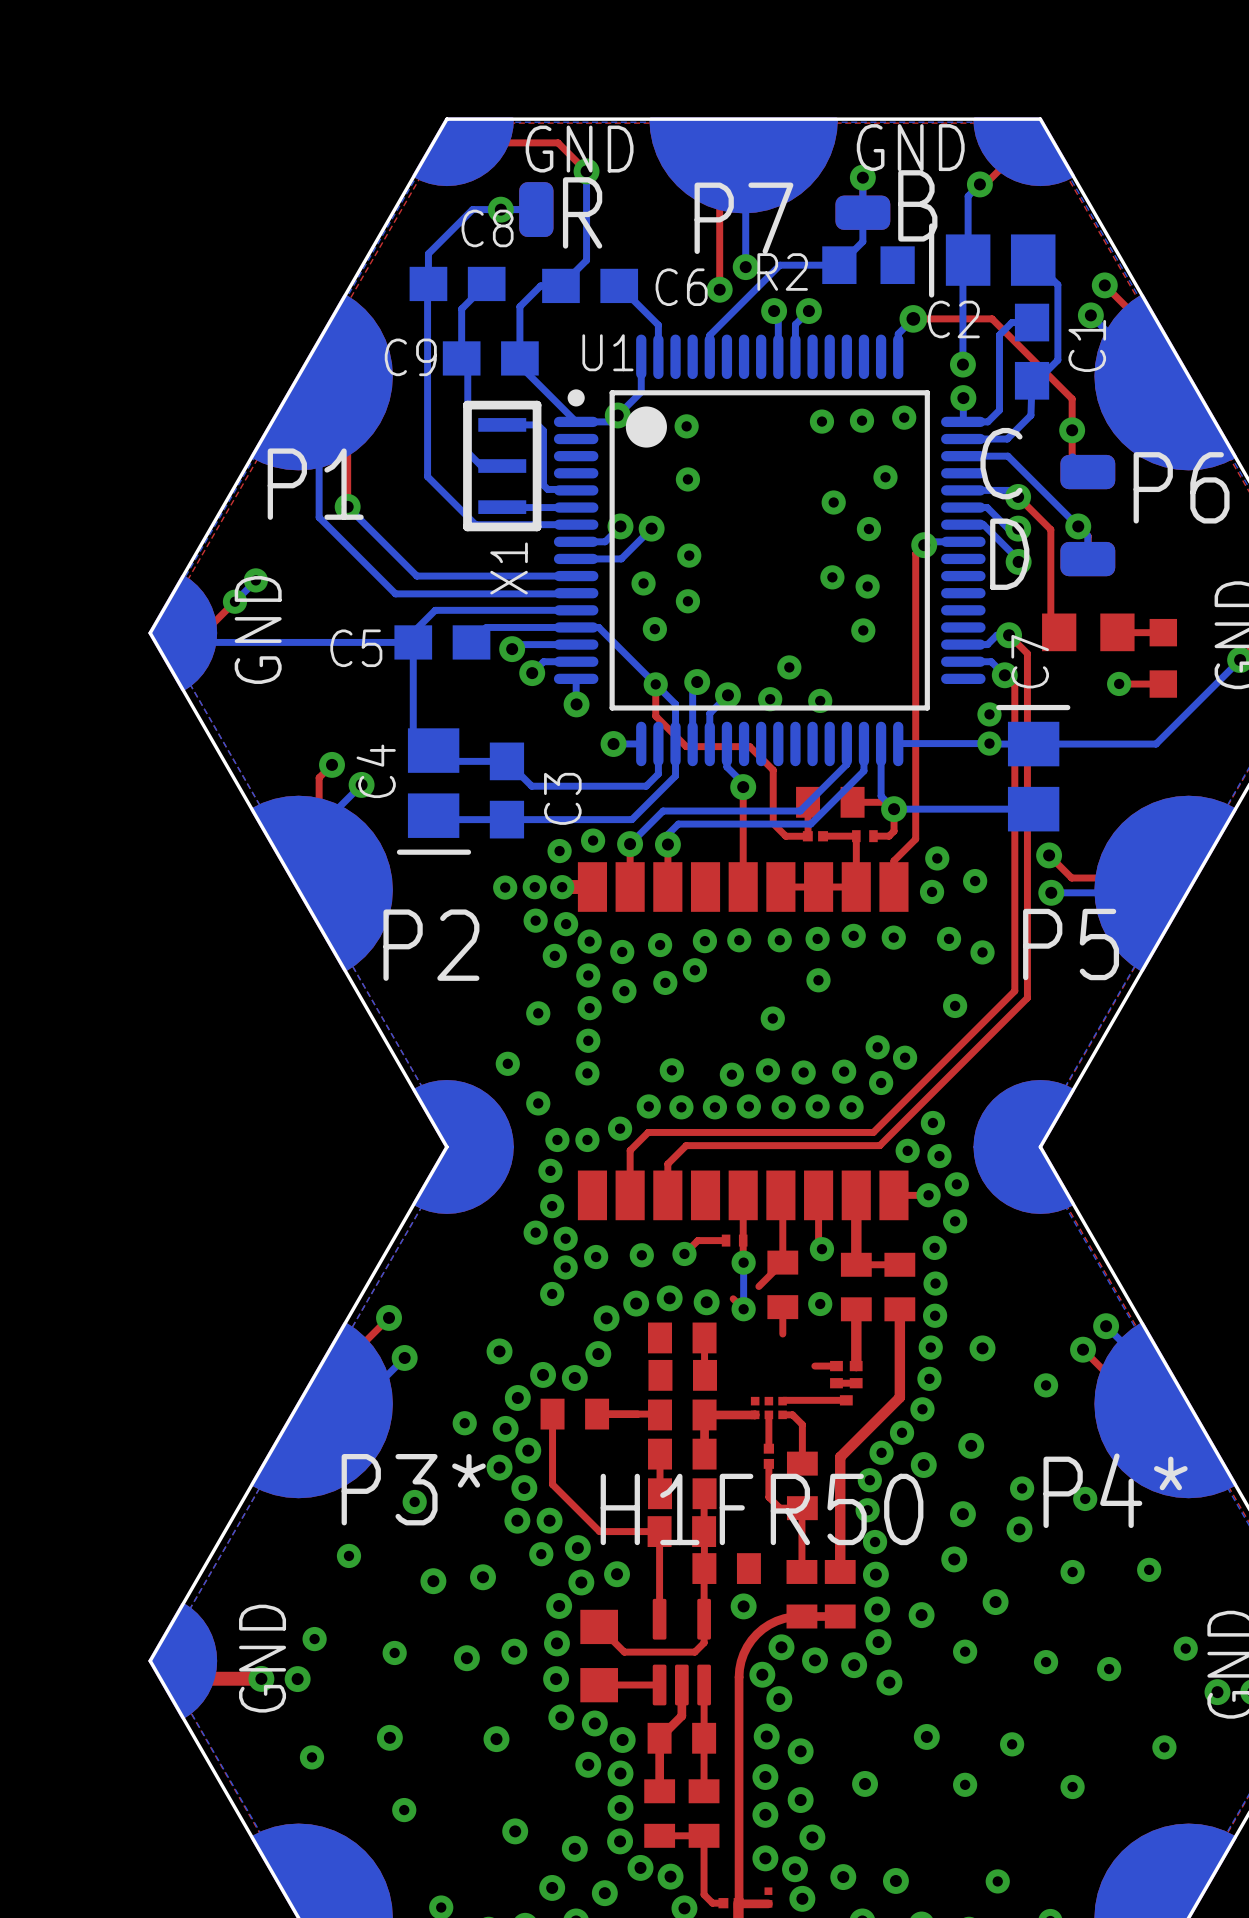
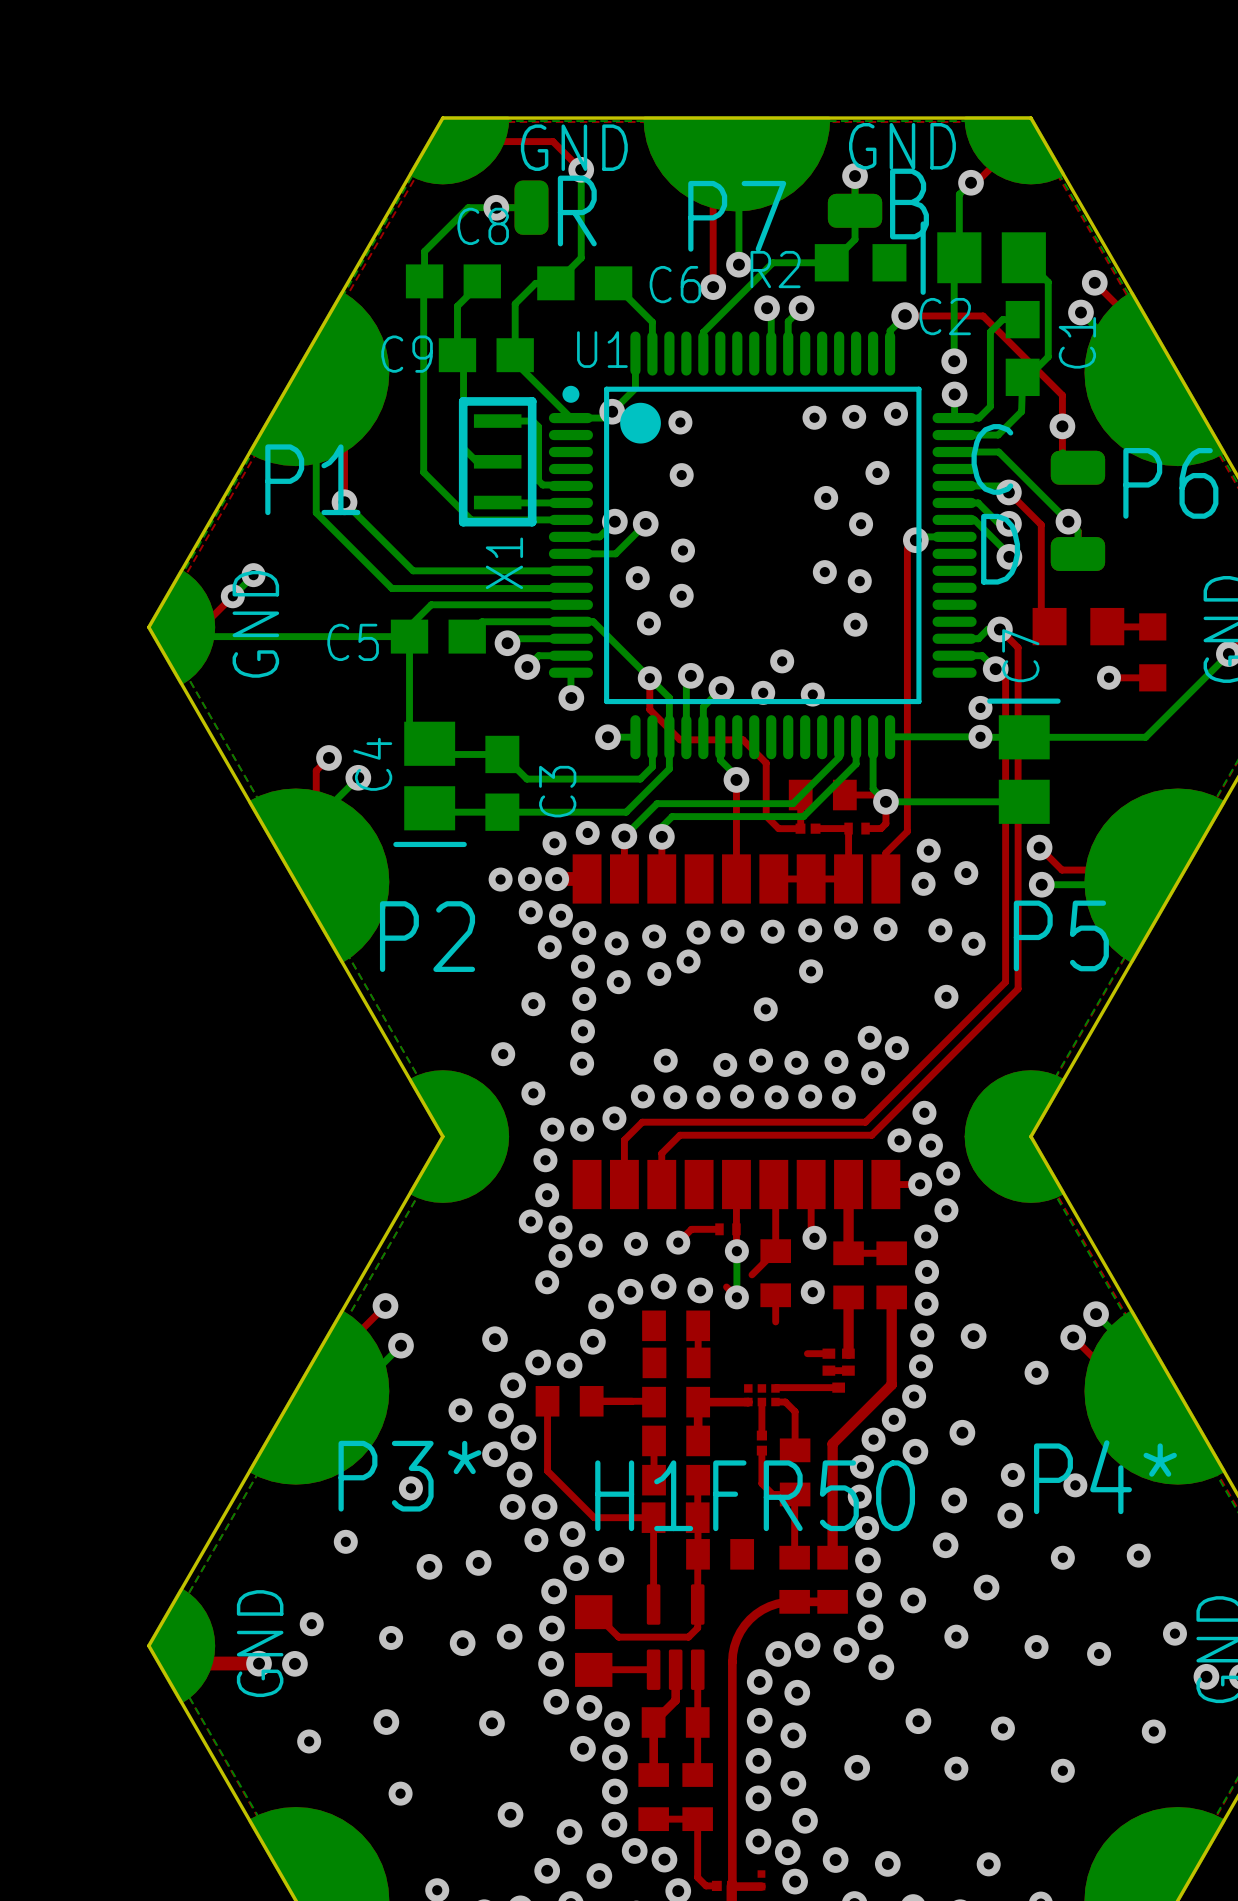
via: (743, 1606) -> none
via: (781, 1647) -> none
via: none -> (778, 1653)
via: (762, 1674) -> none
via: none -> (759, 1681)
via: (779, 1699) -> none
via: none -> (797, 1692)

